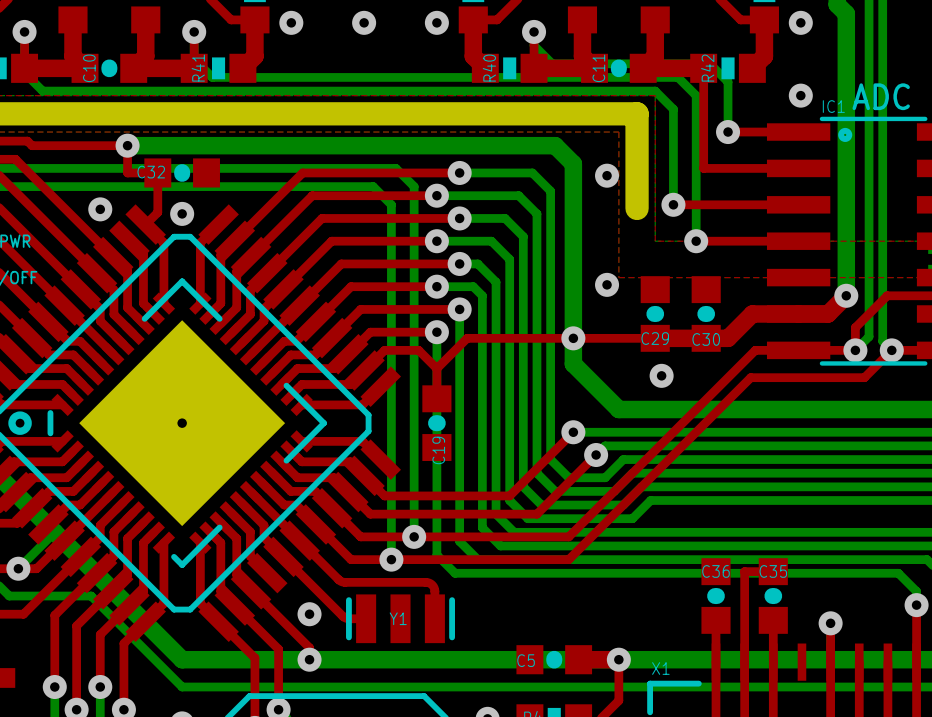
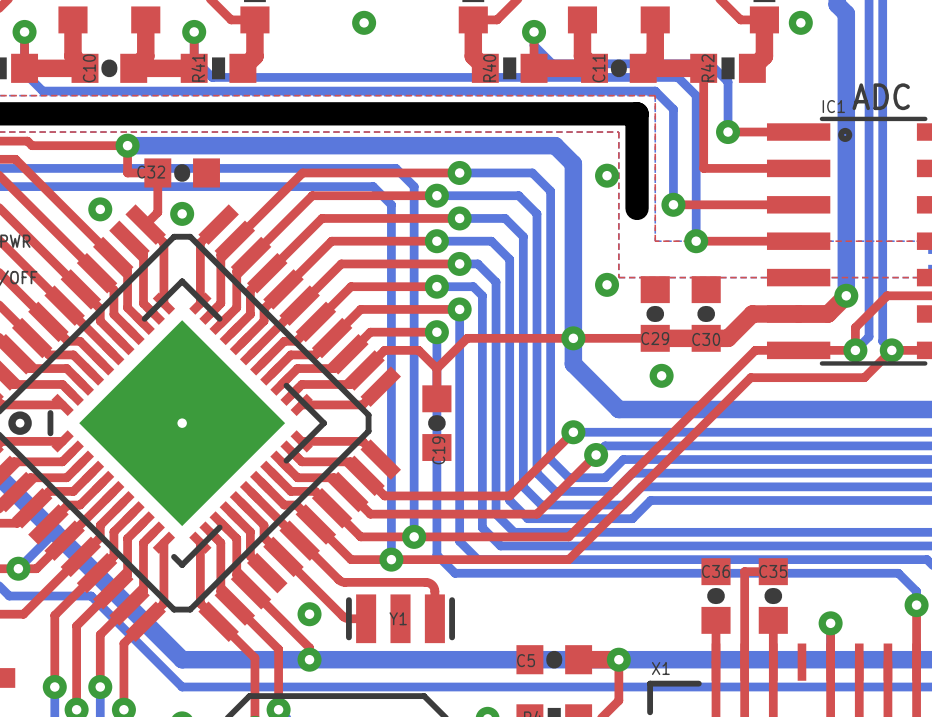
via: (291, 22) -> none
via: (436, 22) -> none
via: (800, 95) -> none

